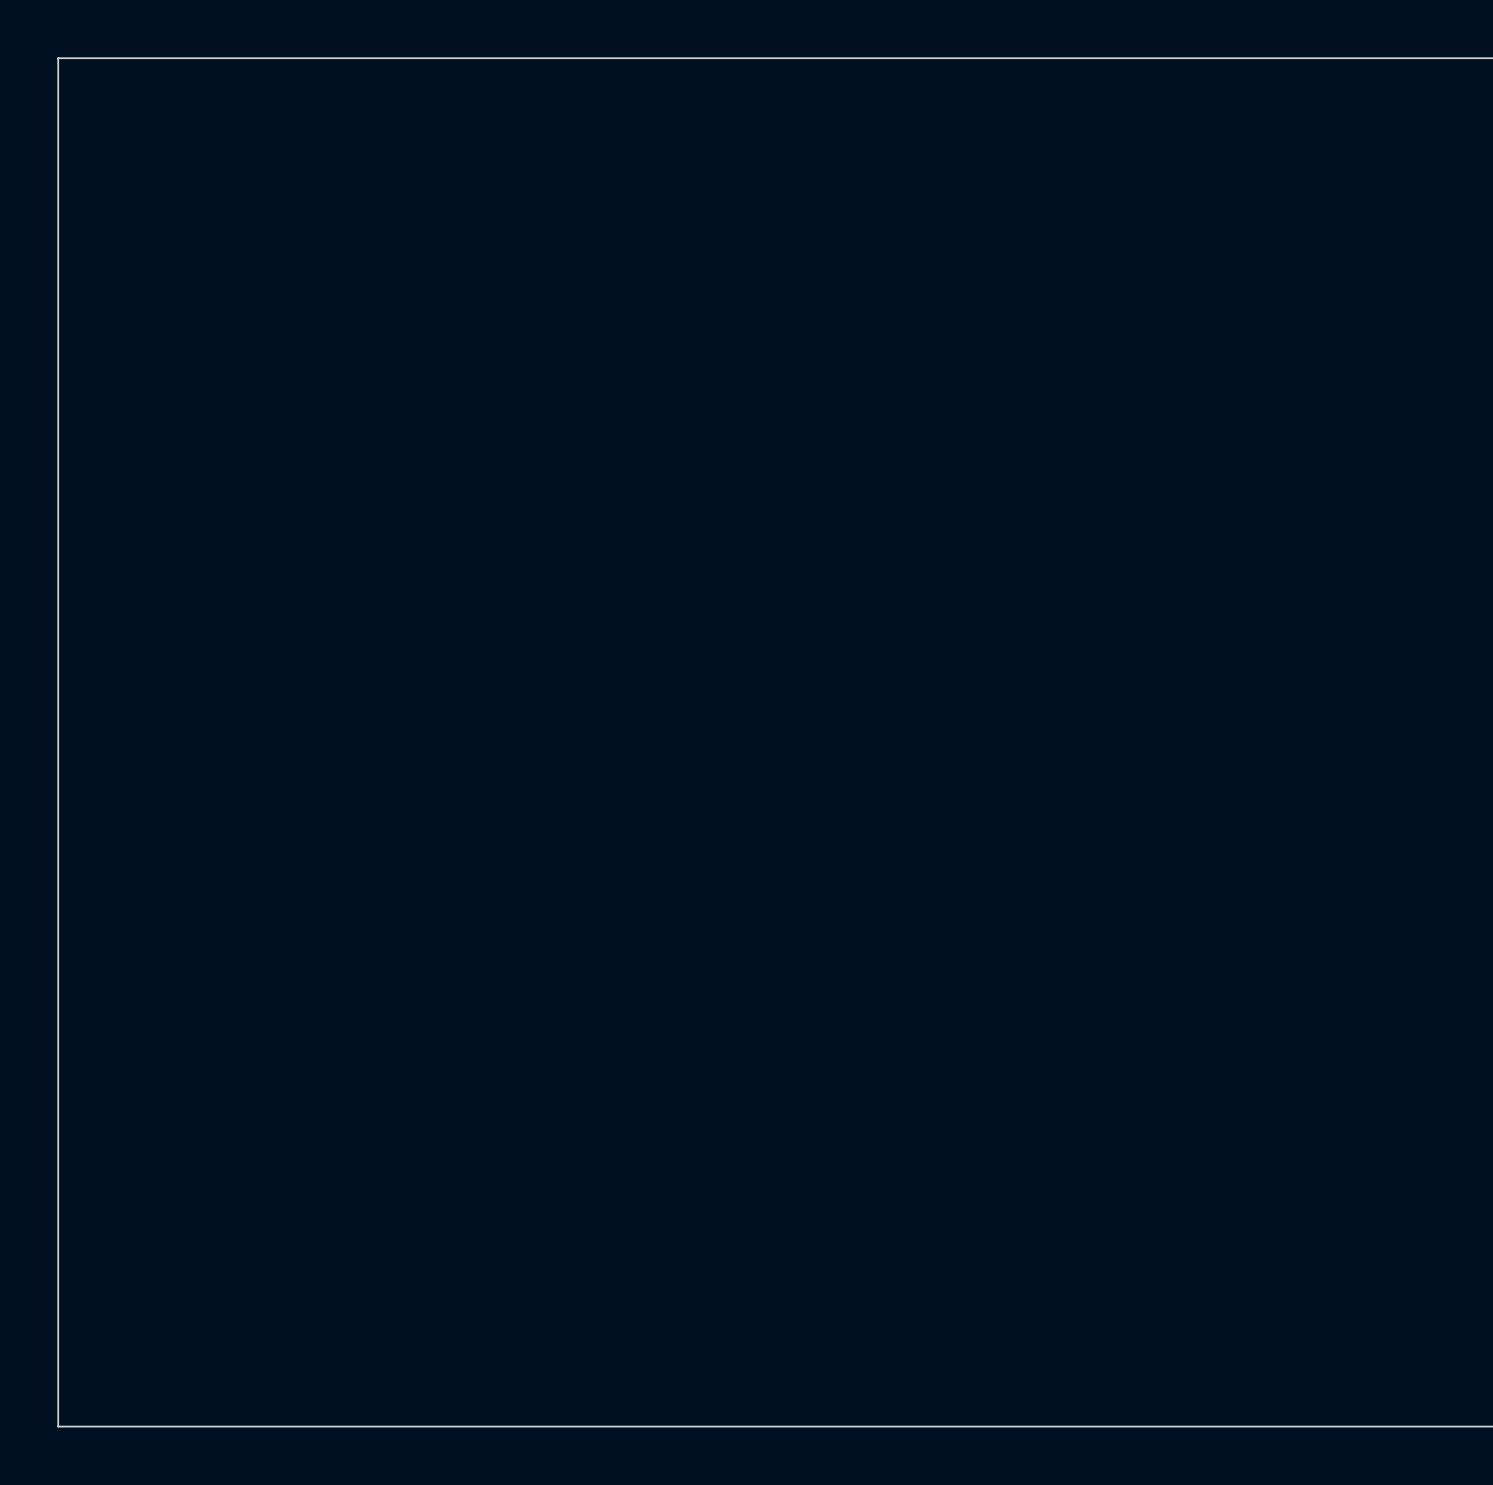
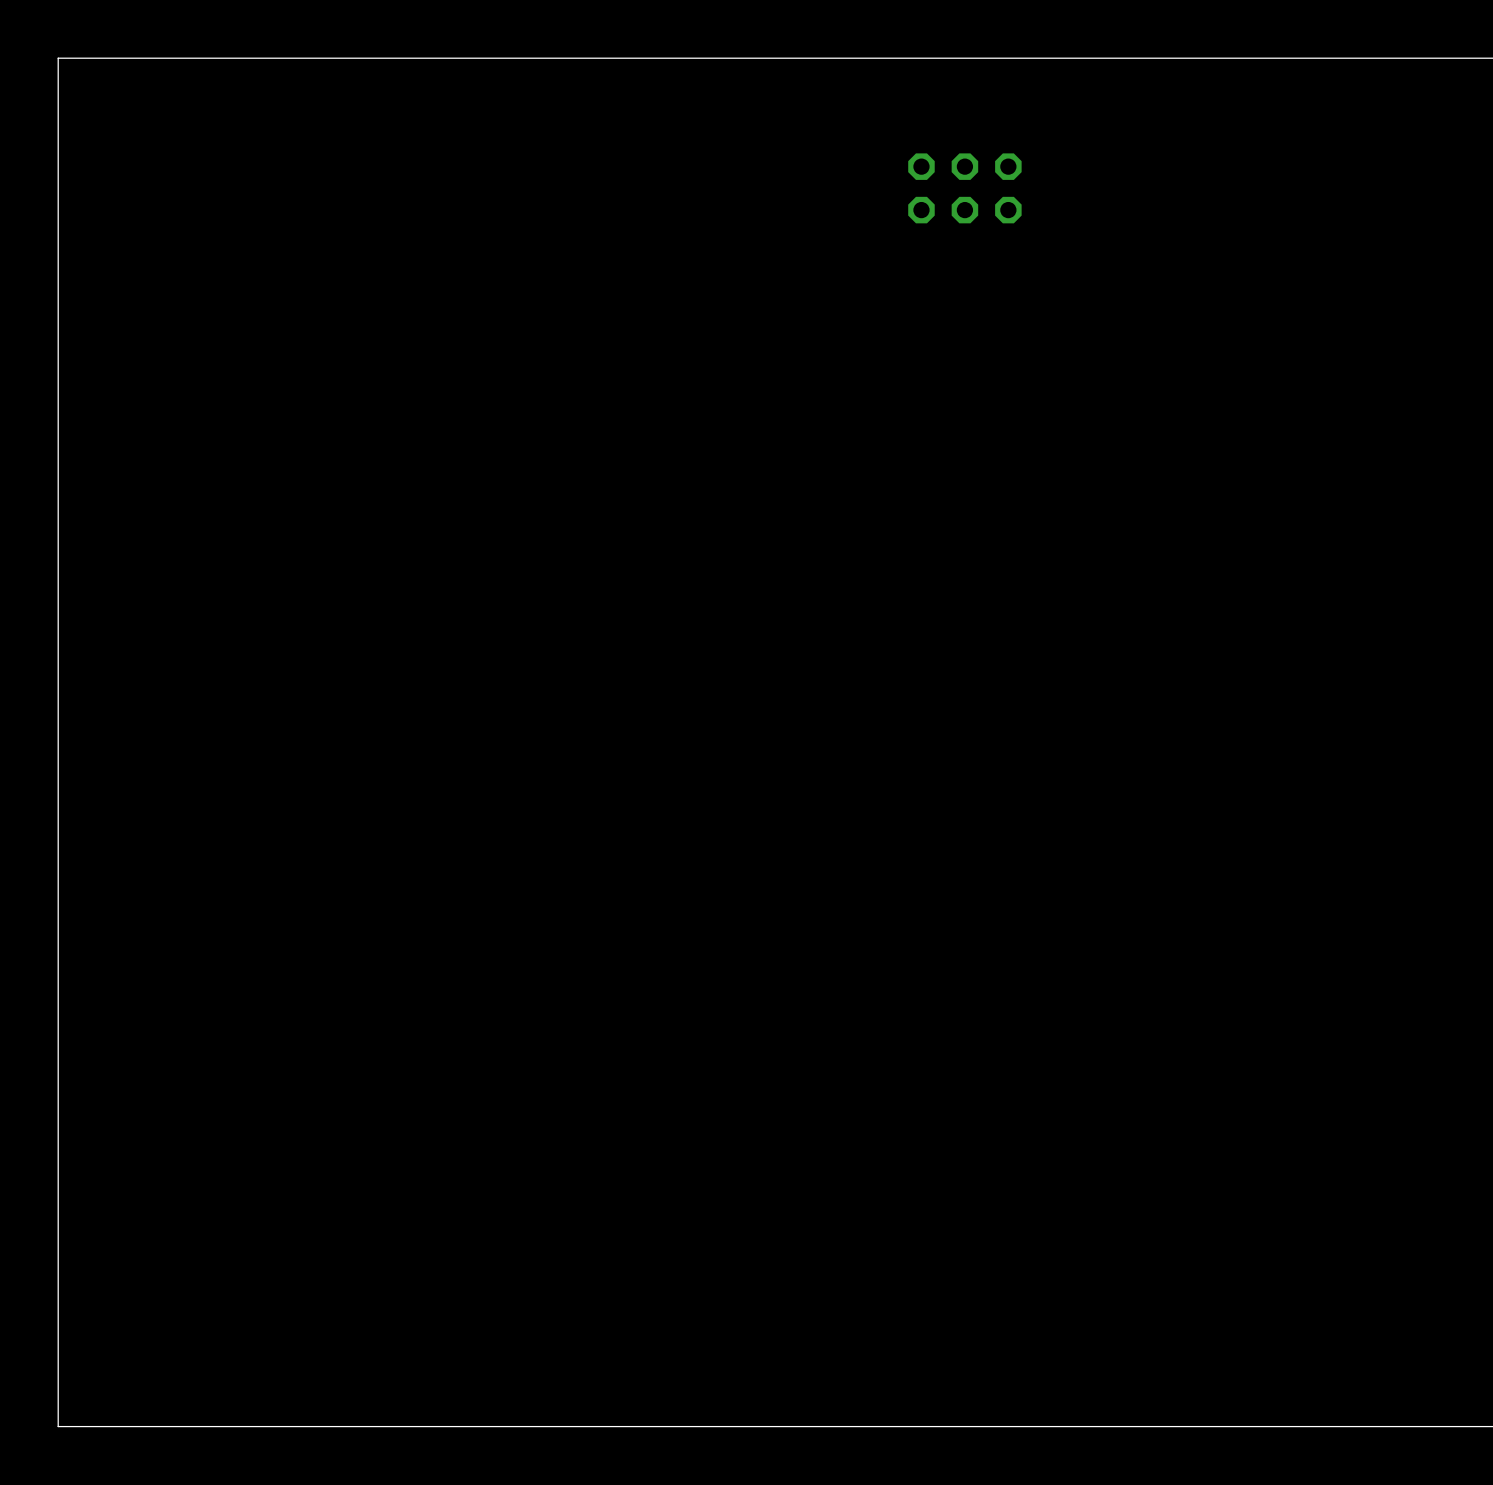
part: none -> (964, 188)

